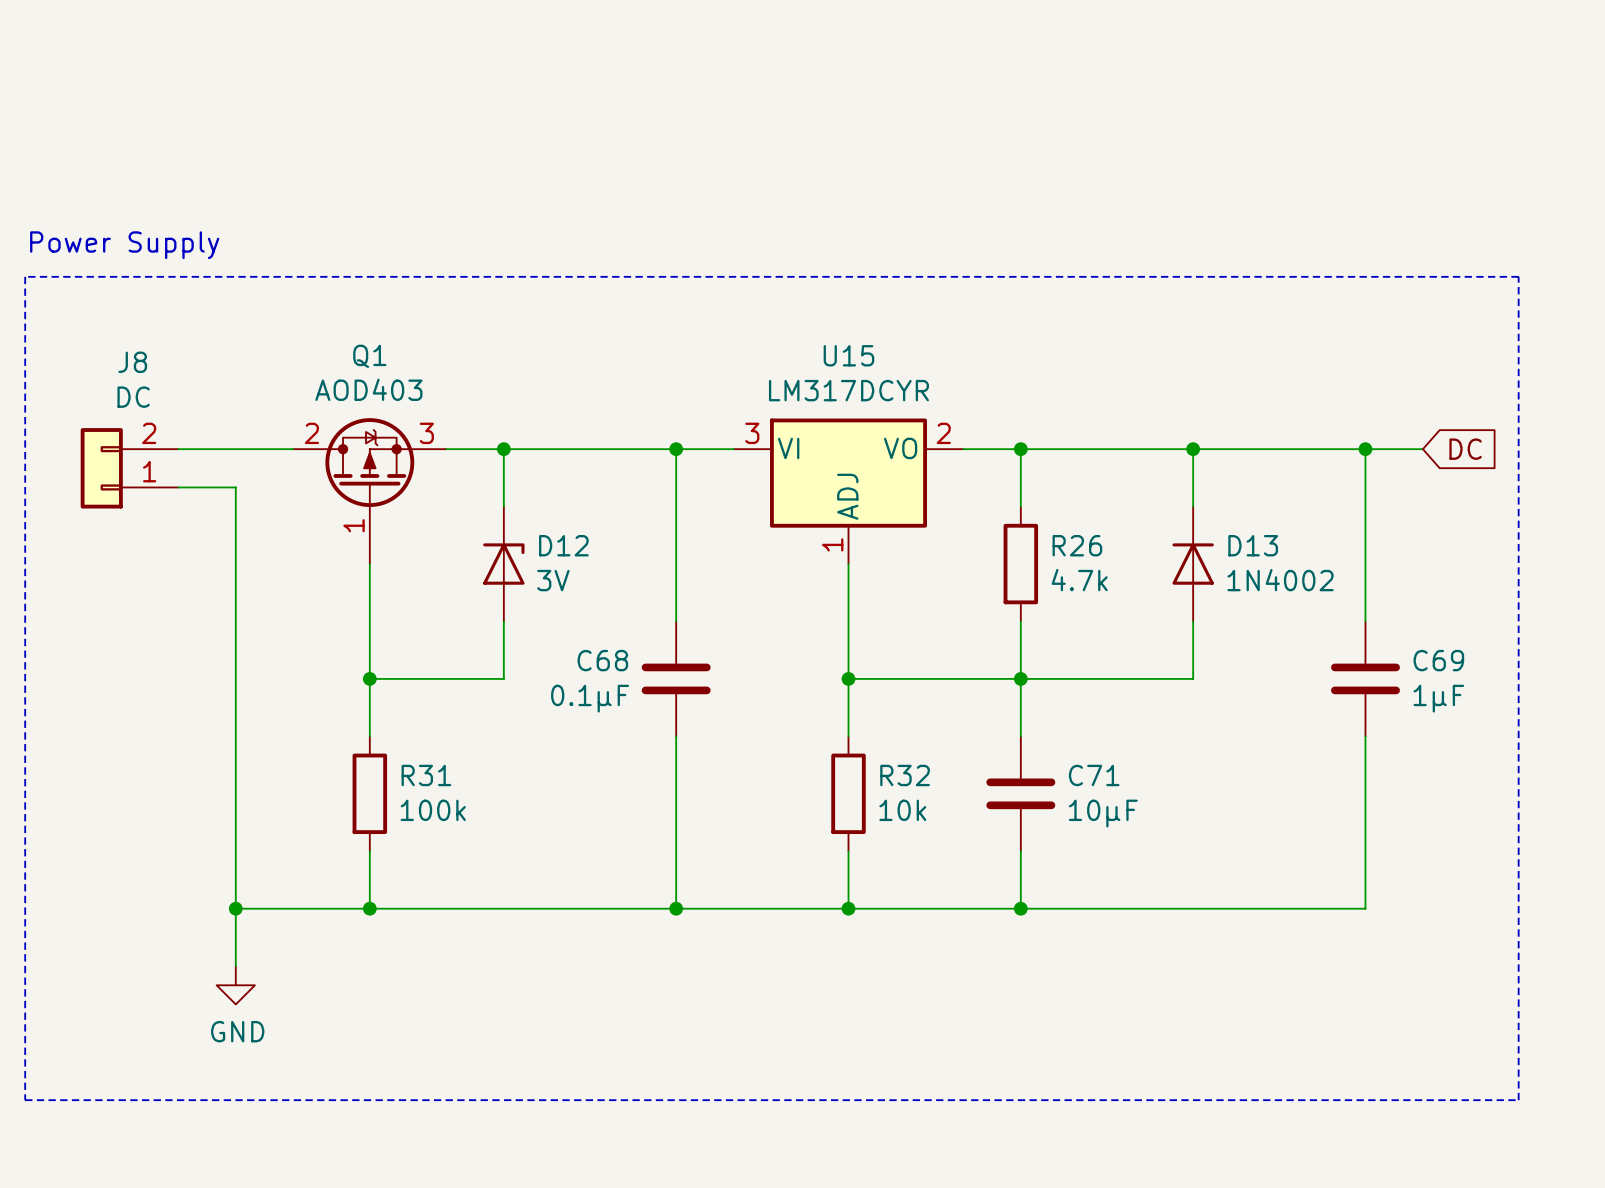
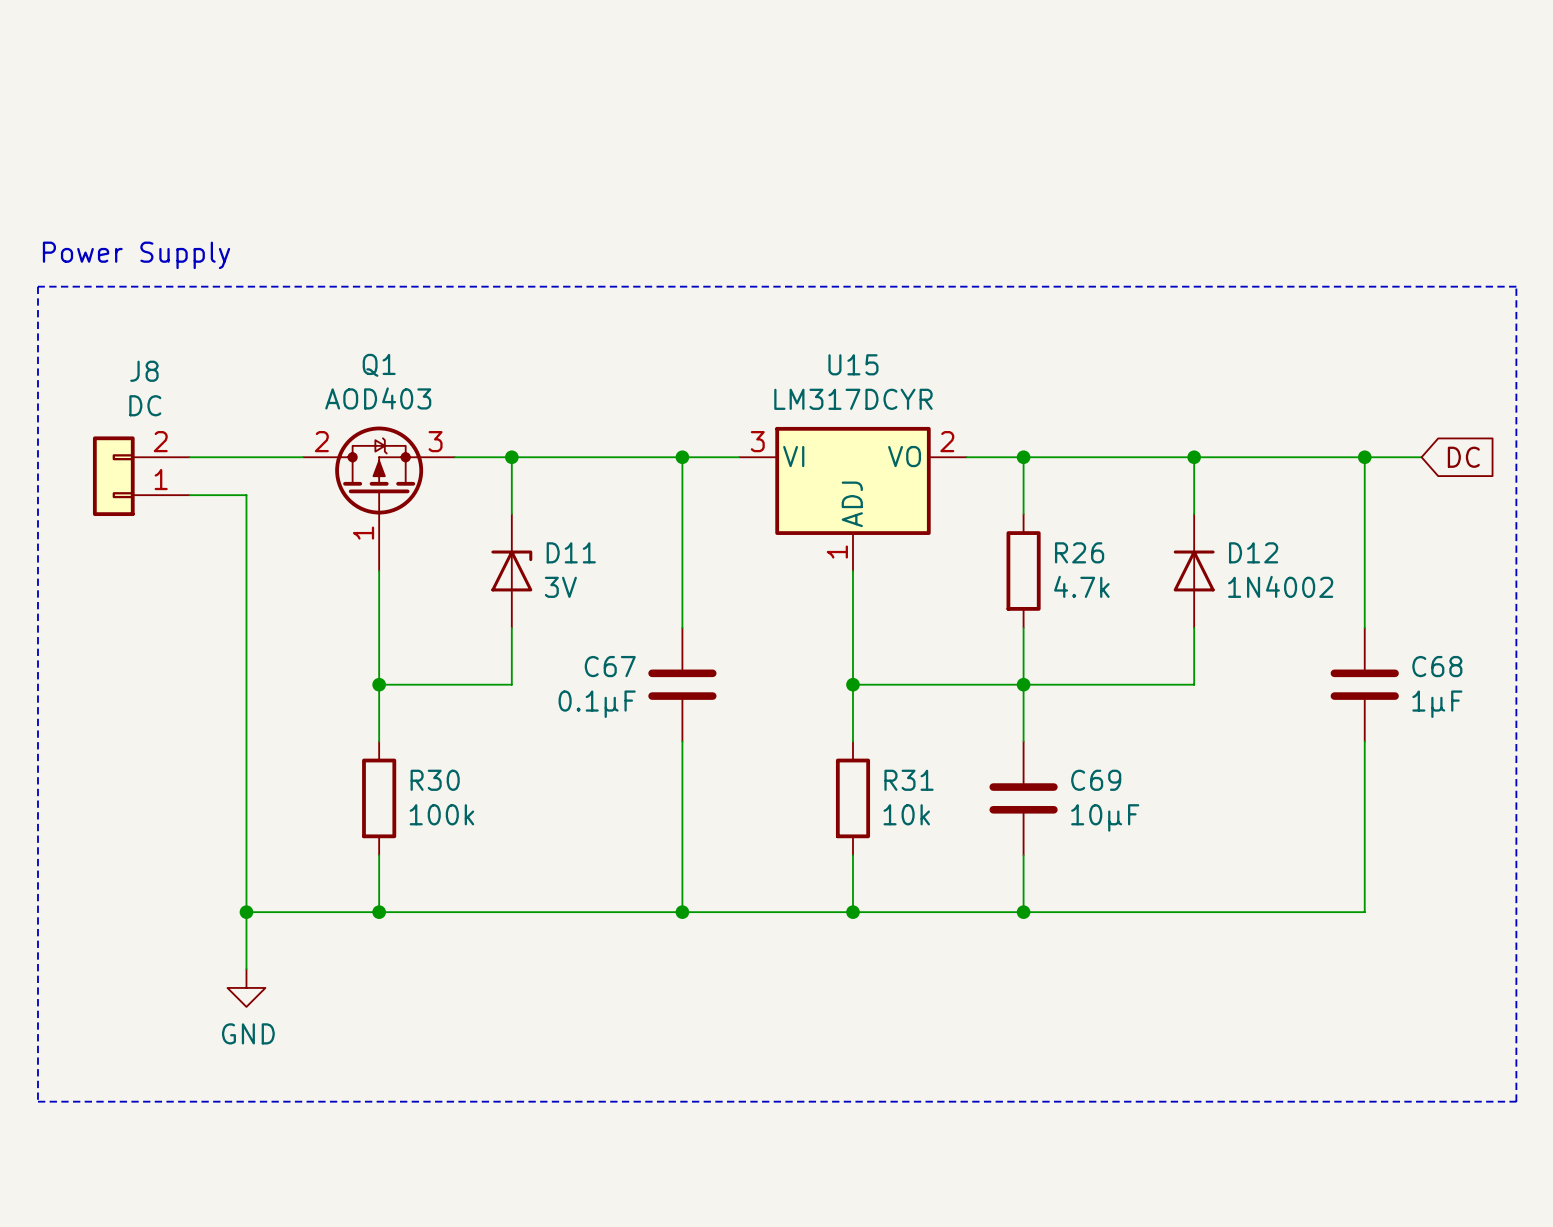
D12 name: D12 (563, 545) -> D11 (571, 552)
D13 name: D13 (1253, 545) -> D12 (1253, 552)
C68 name: C68 (602, 660) -> C67 (610, 666)
C69 name: C69 (1438, 660) -> C68 (1437, 666)
R31 name: R31 (426, 775) -> R30 (435, 780)
R32 name: R32 (905, 775) -> R31 (909, 780)
C71 name: C71 (1094, 775) -> C69 (1096, 780)

